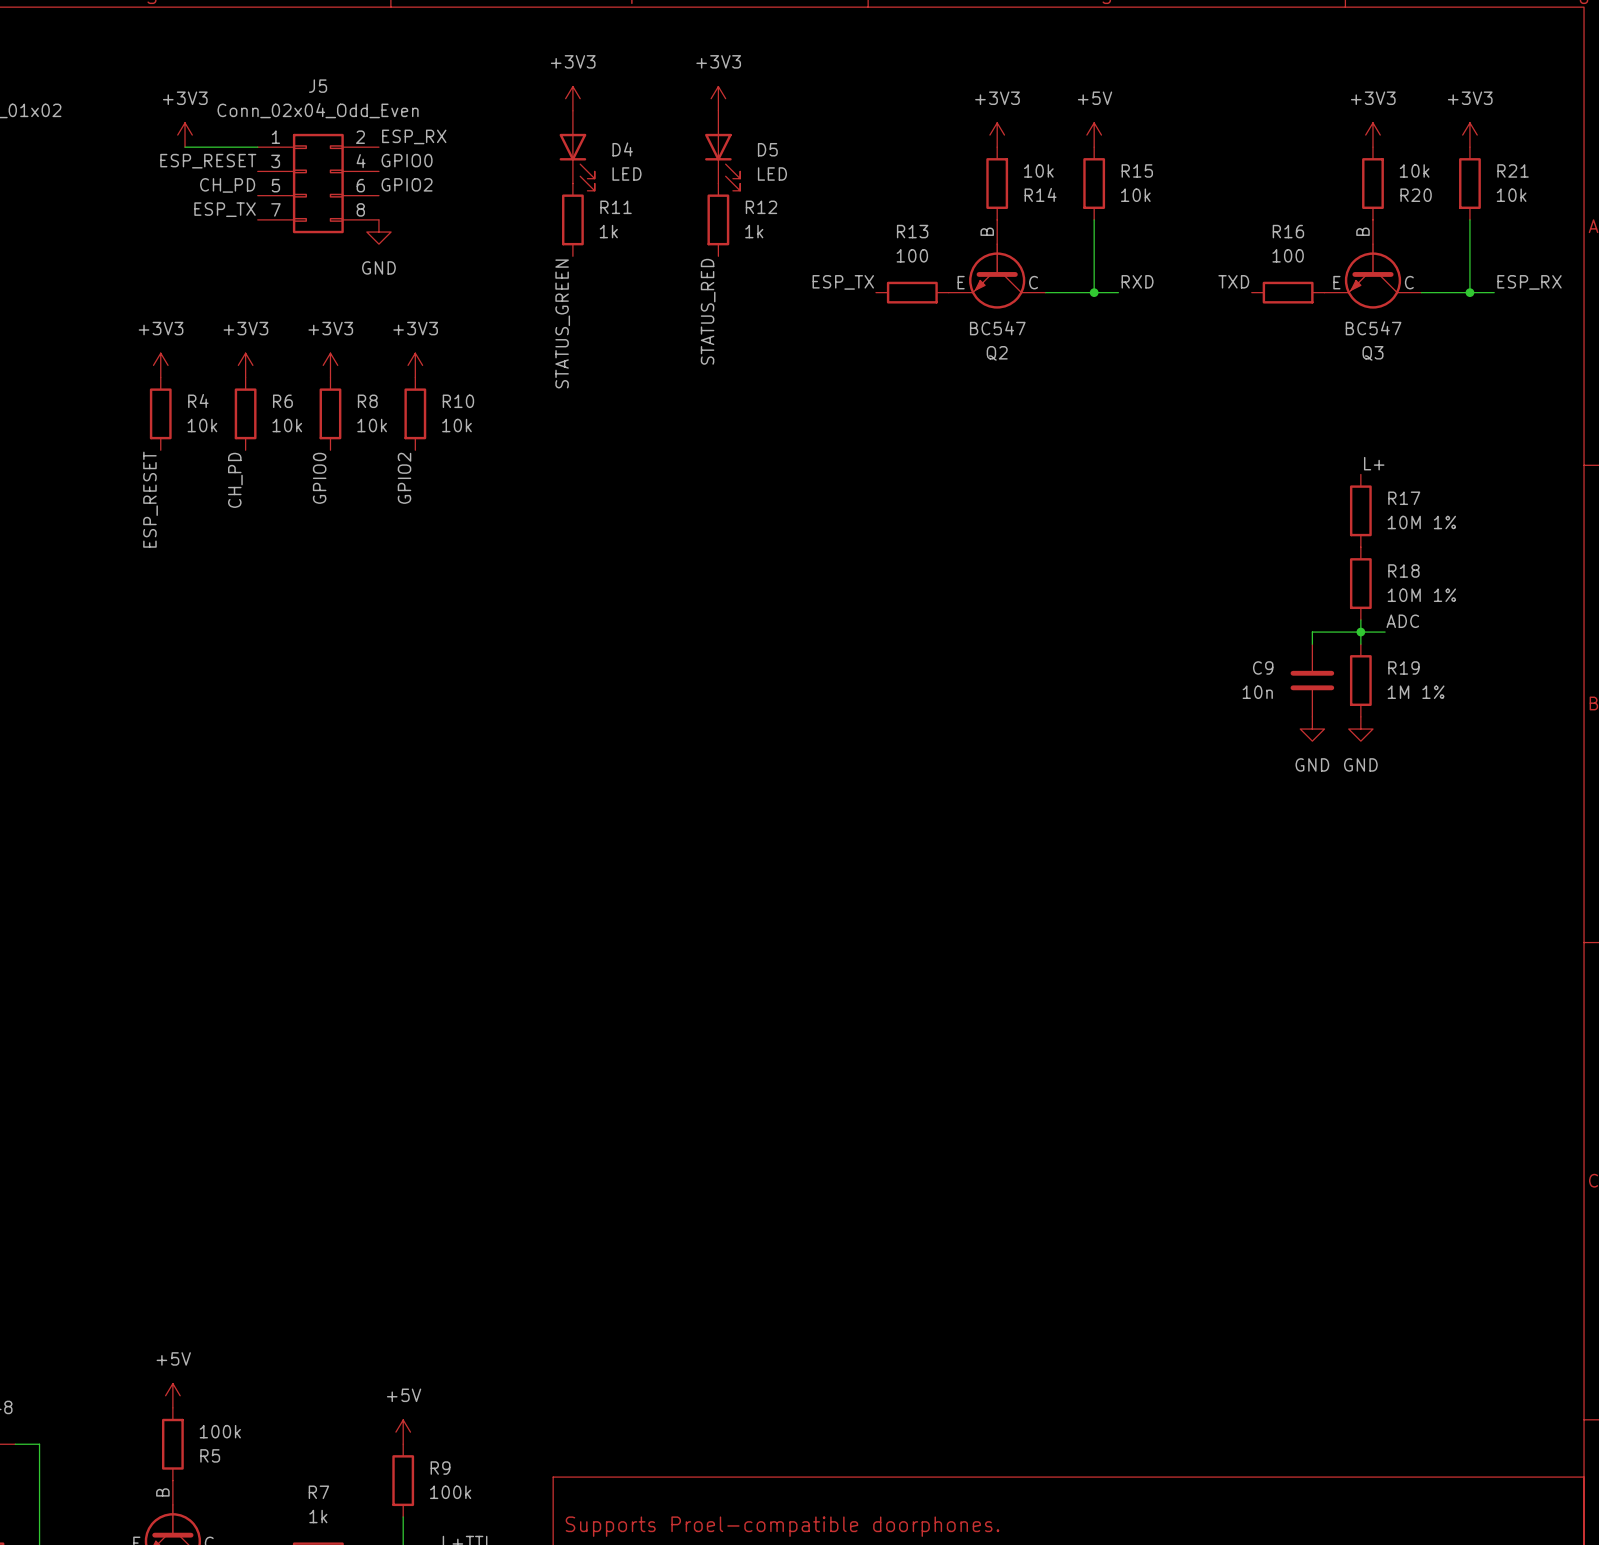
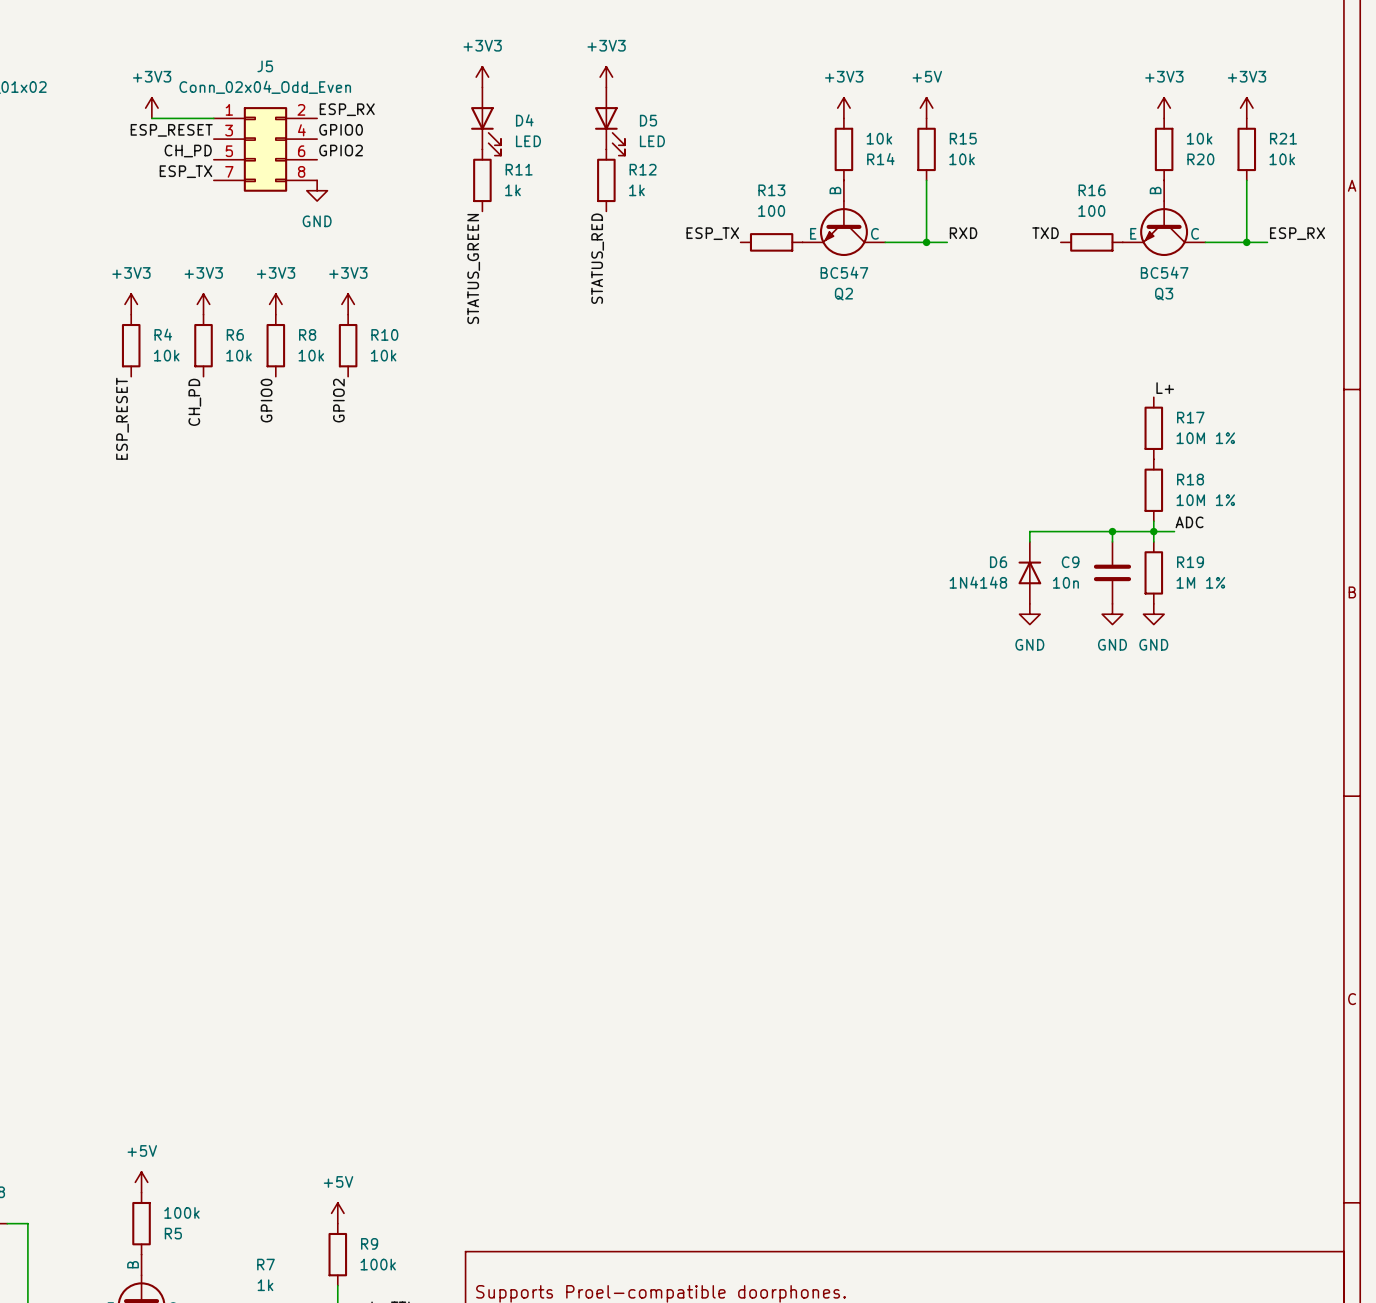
wire: none -> (1112, 531) (1029, 531) (1029, 541)
junction: none -> (1112, 531)
D6: none -> 1N4148 (1029, 572)
power symbol: none -> GND (1029, 614)

